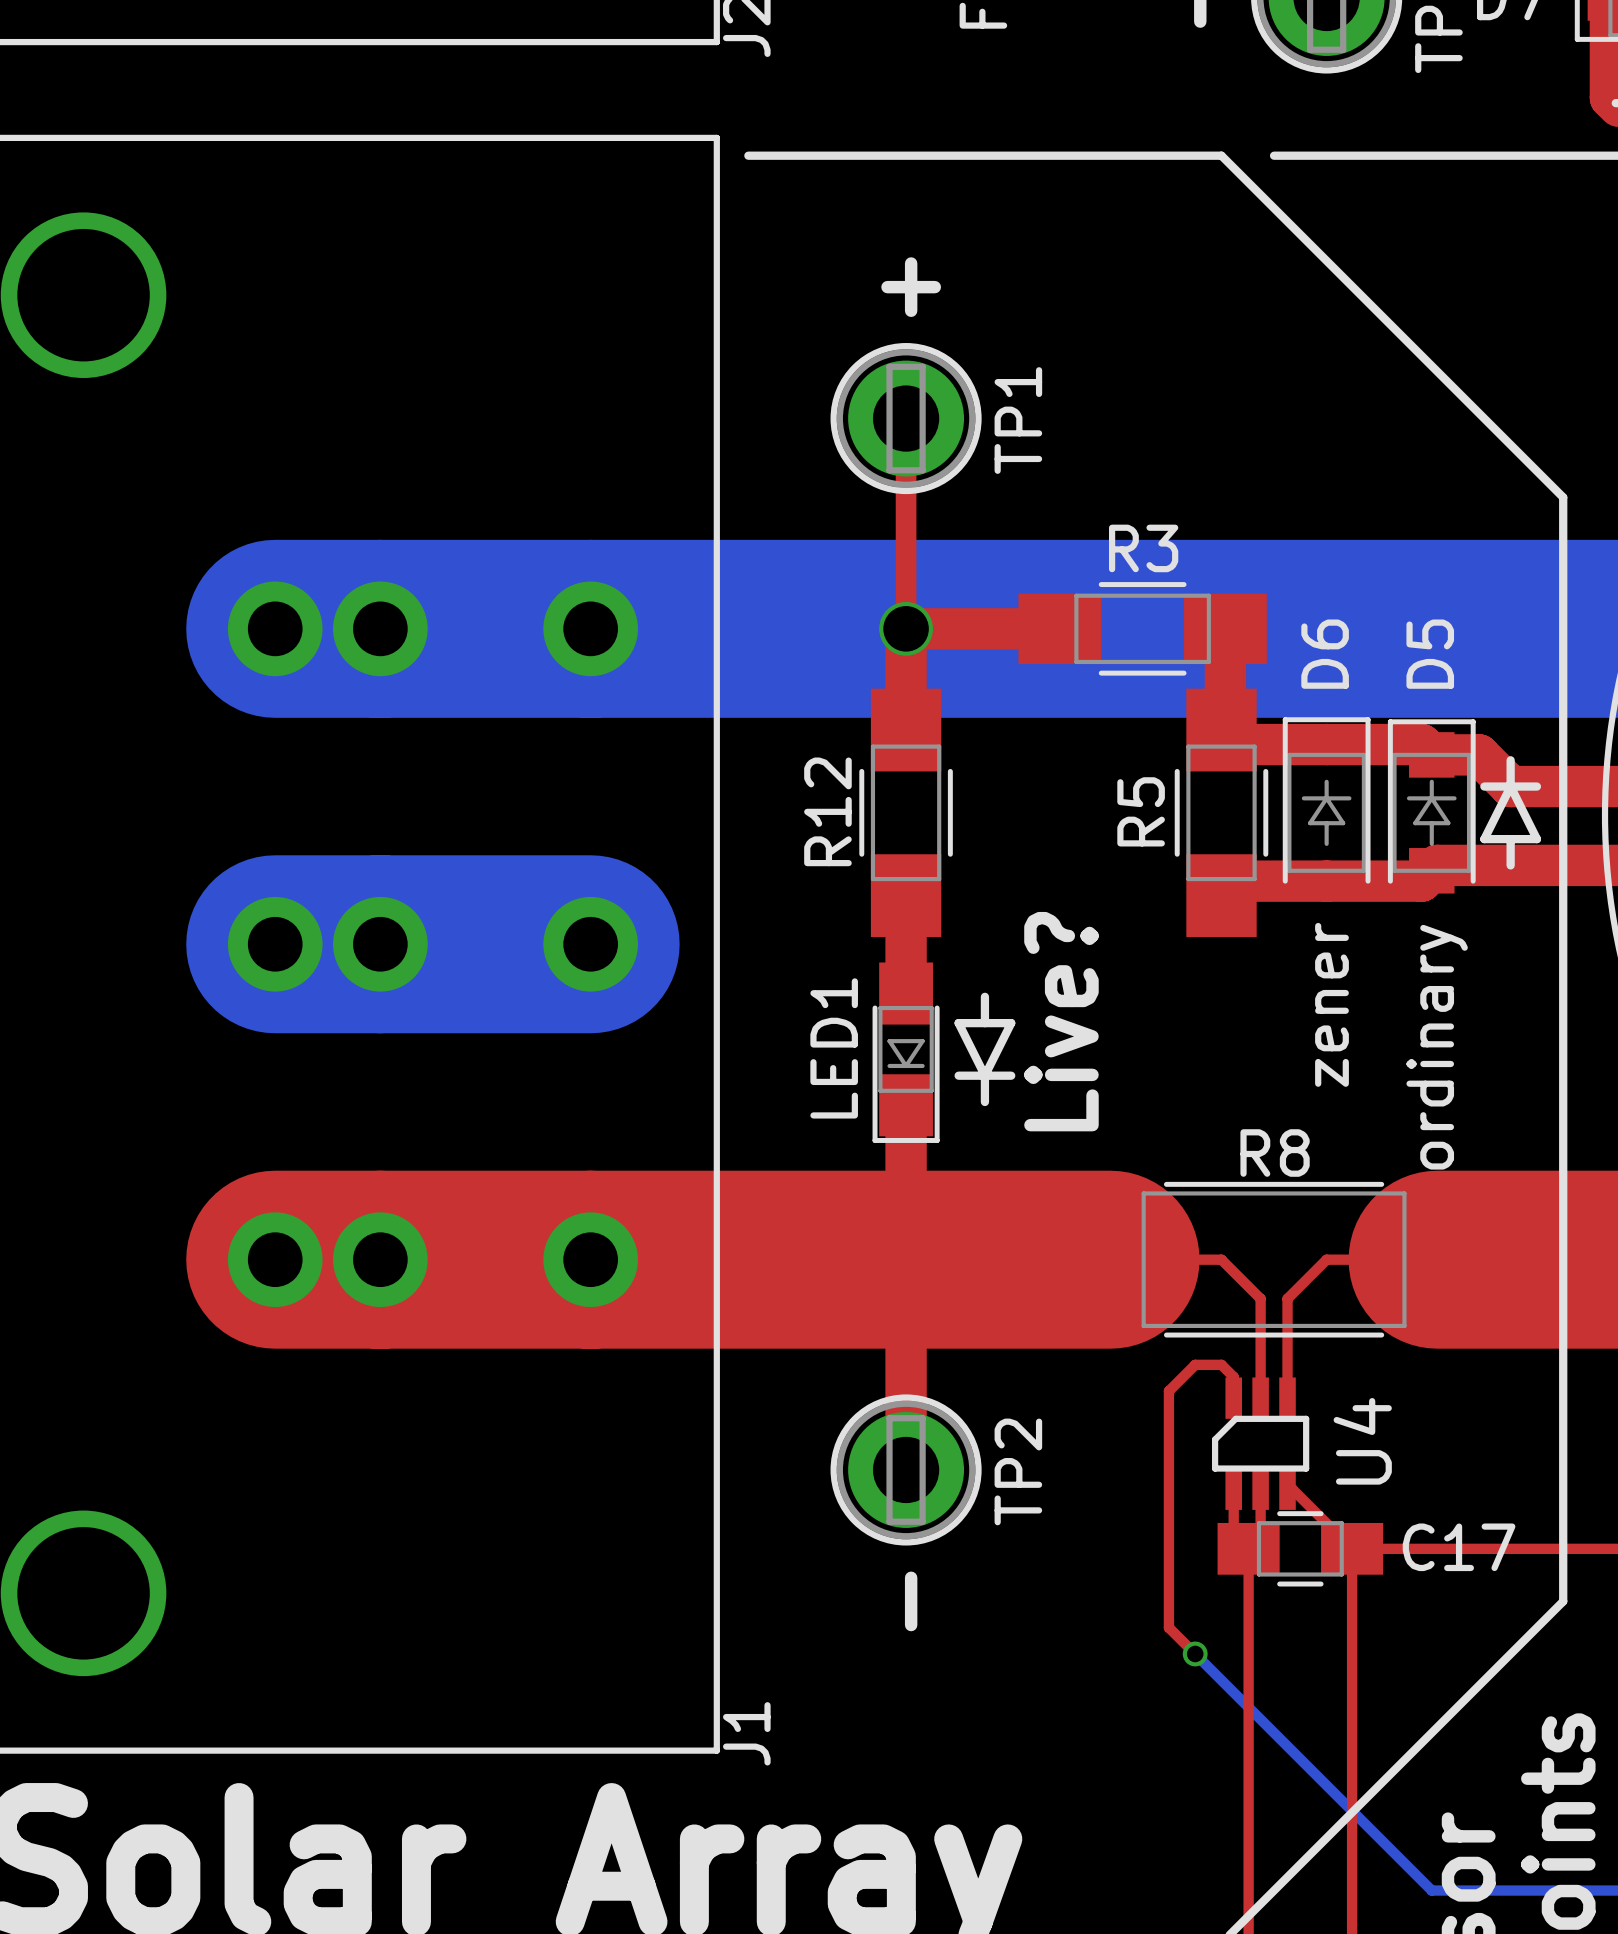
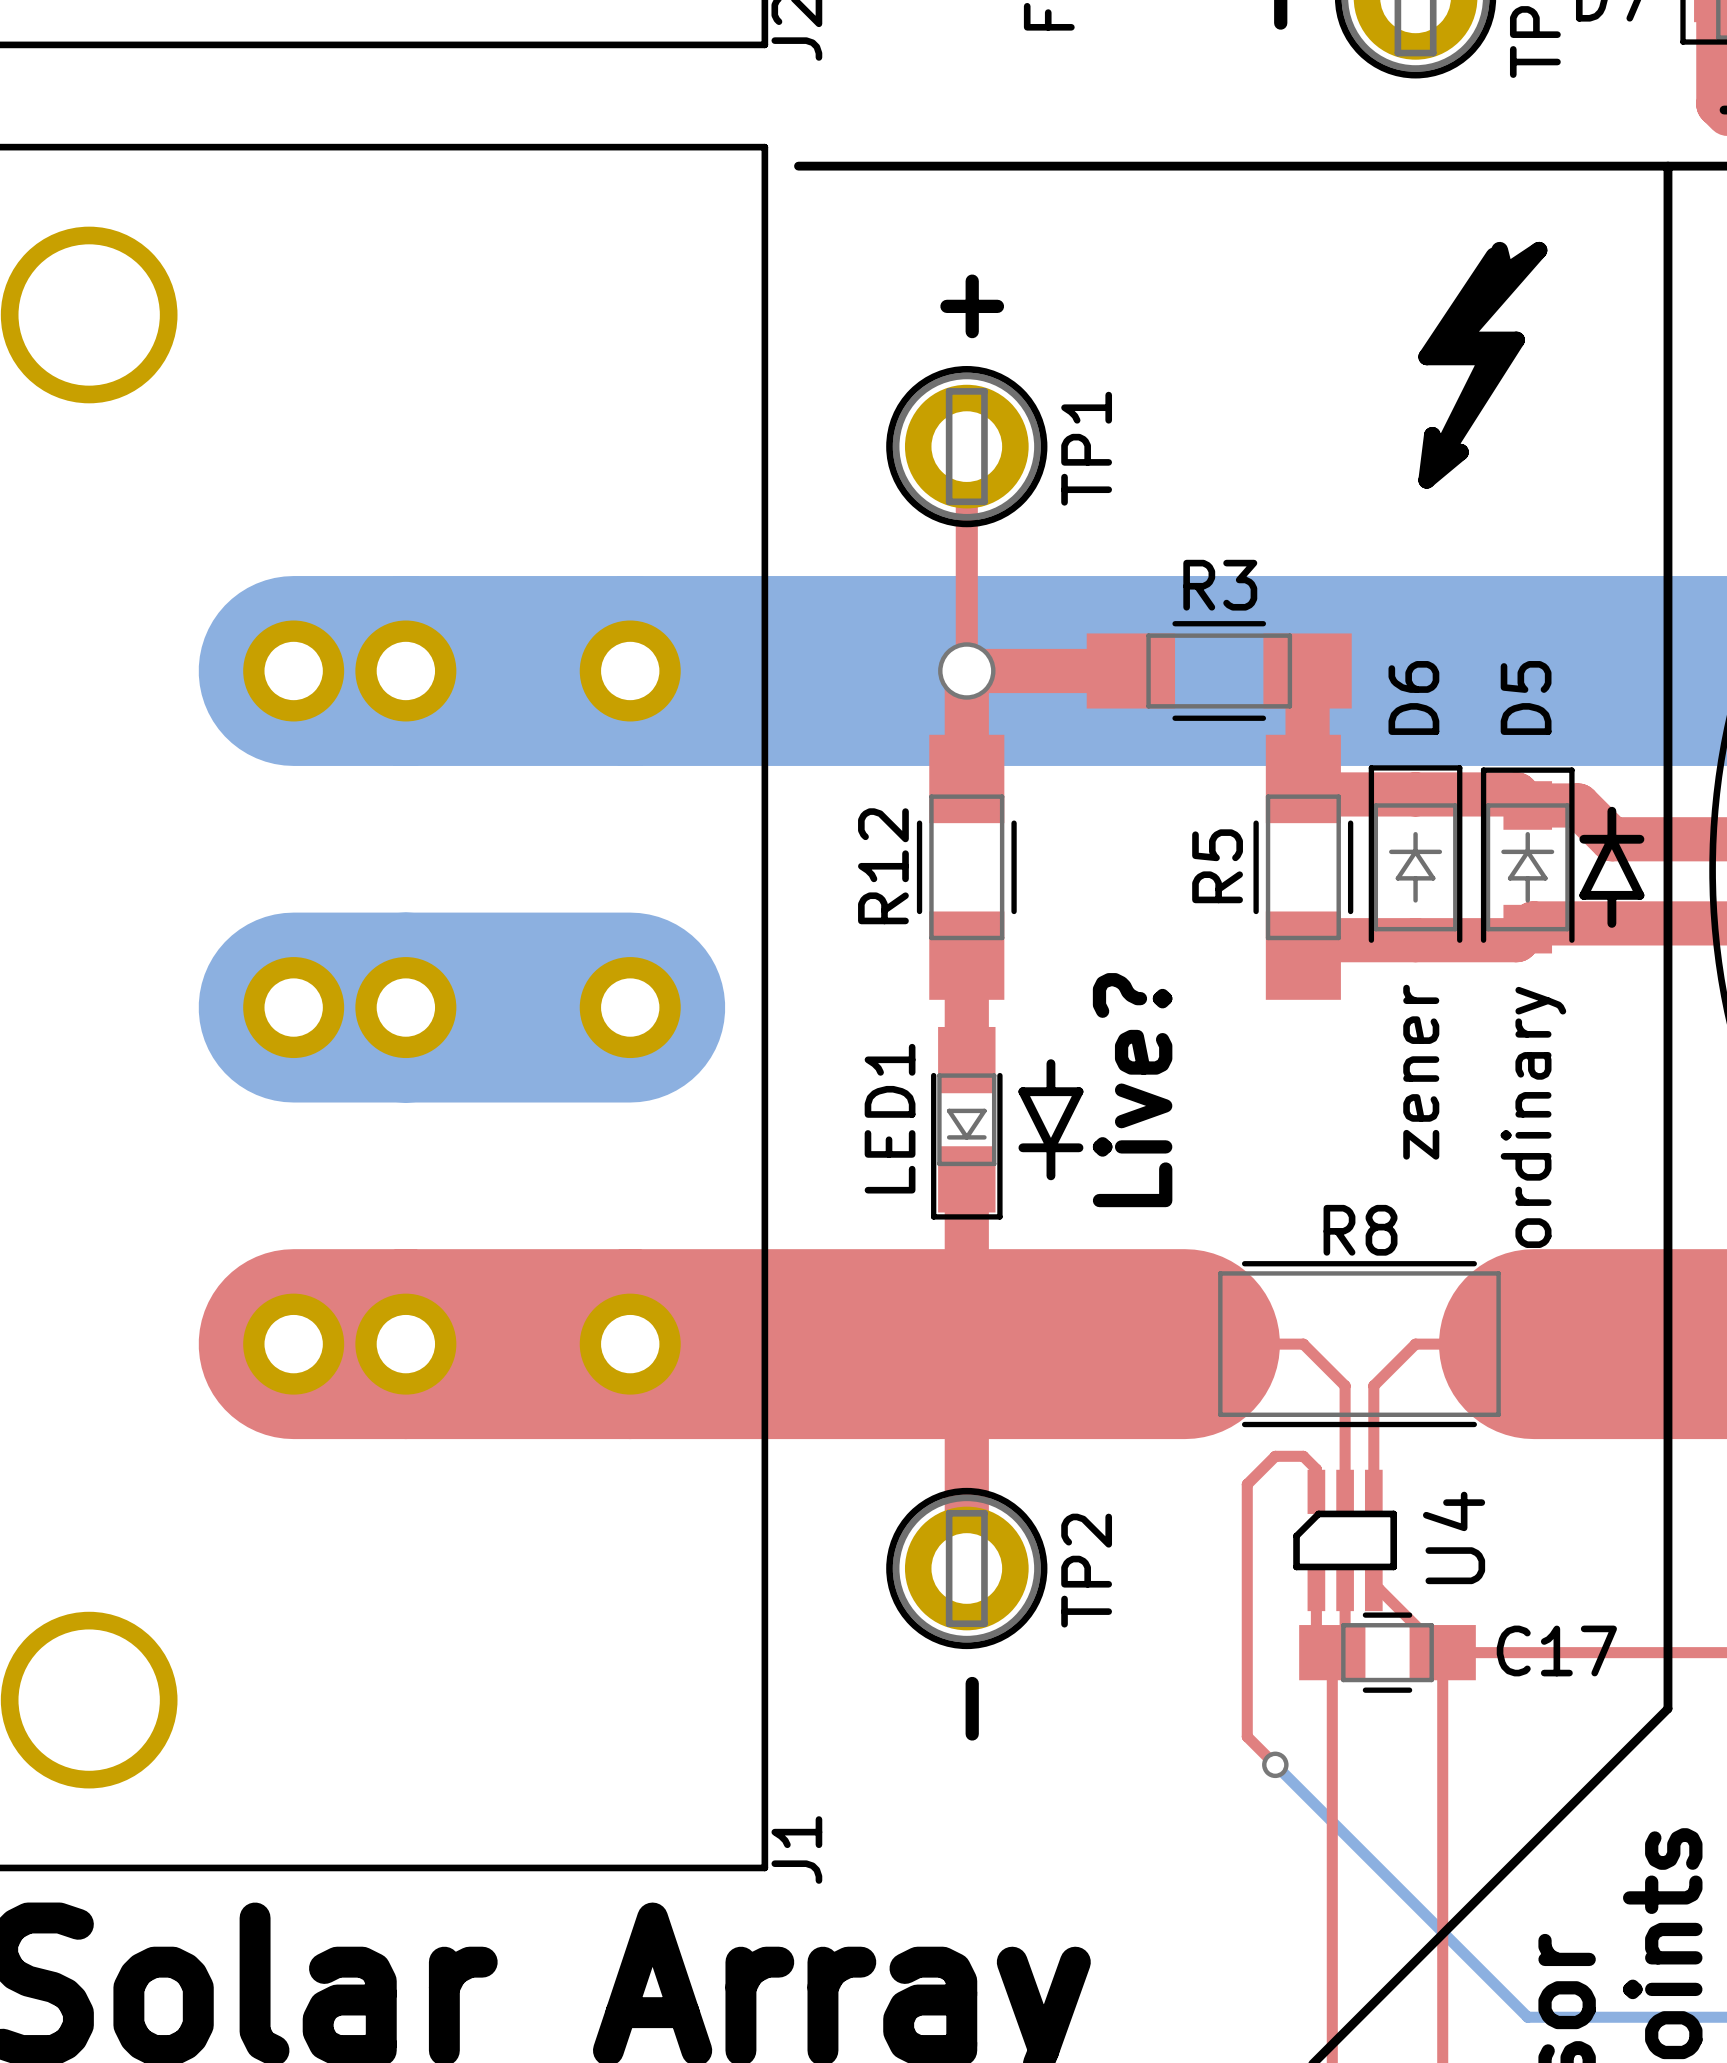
line: (1221, 155) (1563, 497) -> (1667, 166) (1667, 530)
line: none -> (1303, 166) (1359, 166)
drawing: none -> [1418, 241, 1548, 489]

